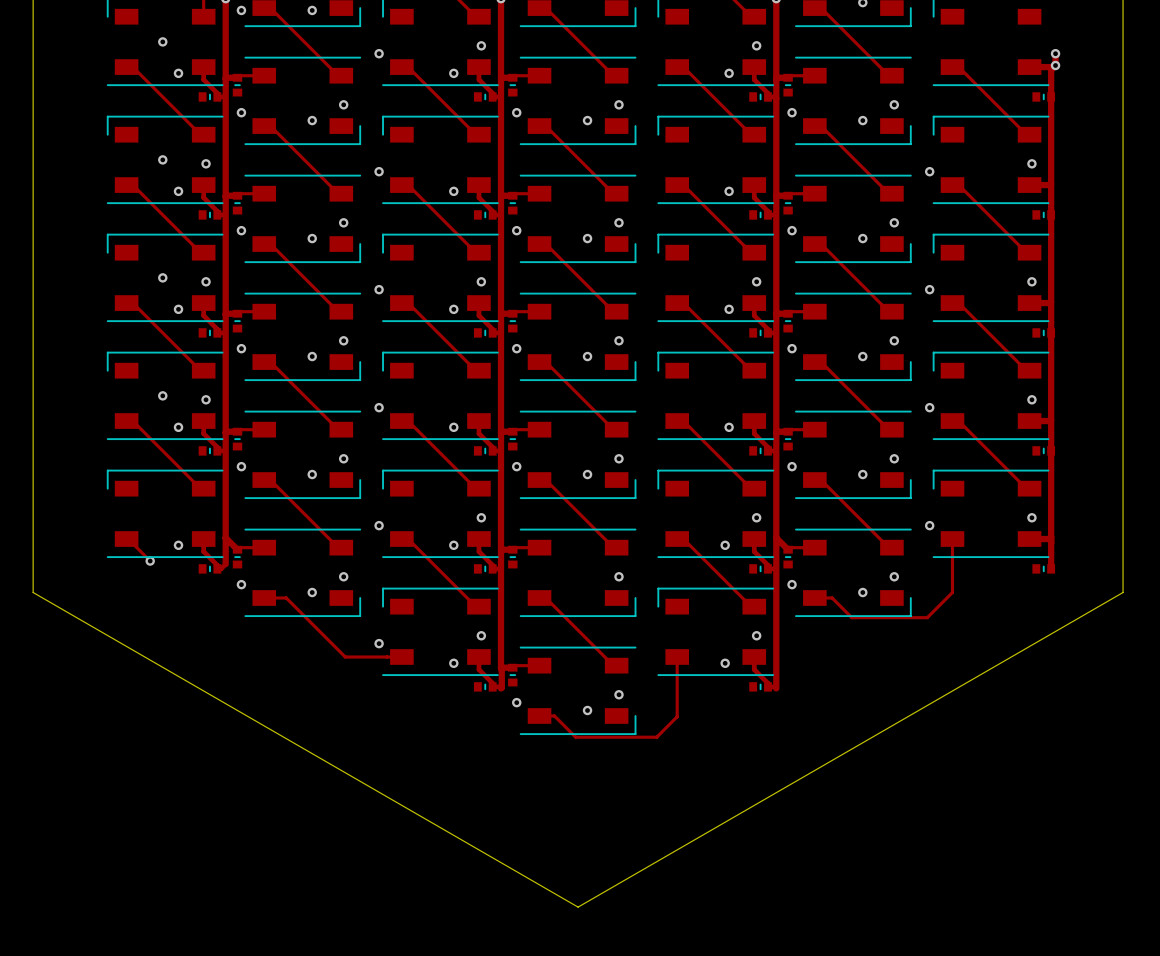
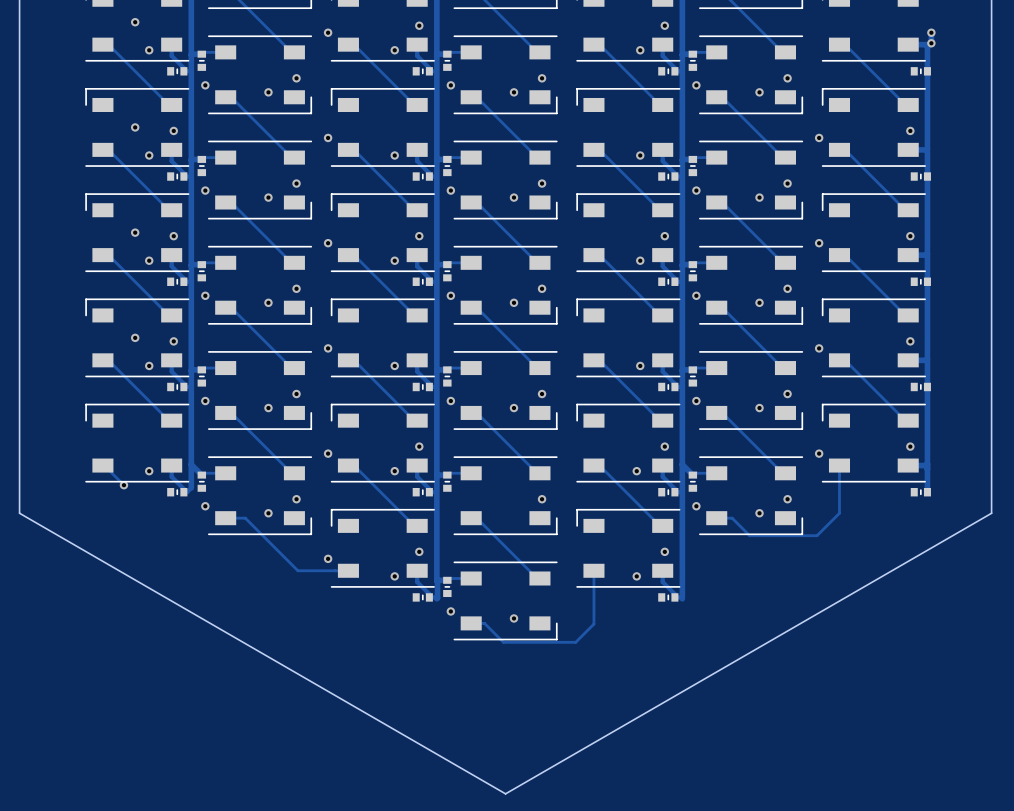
via: (618, 694) -> none

